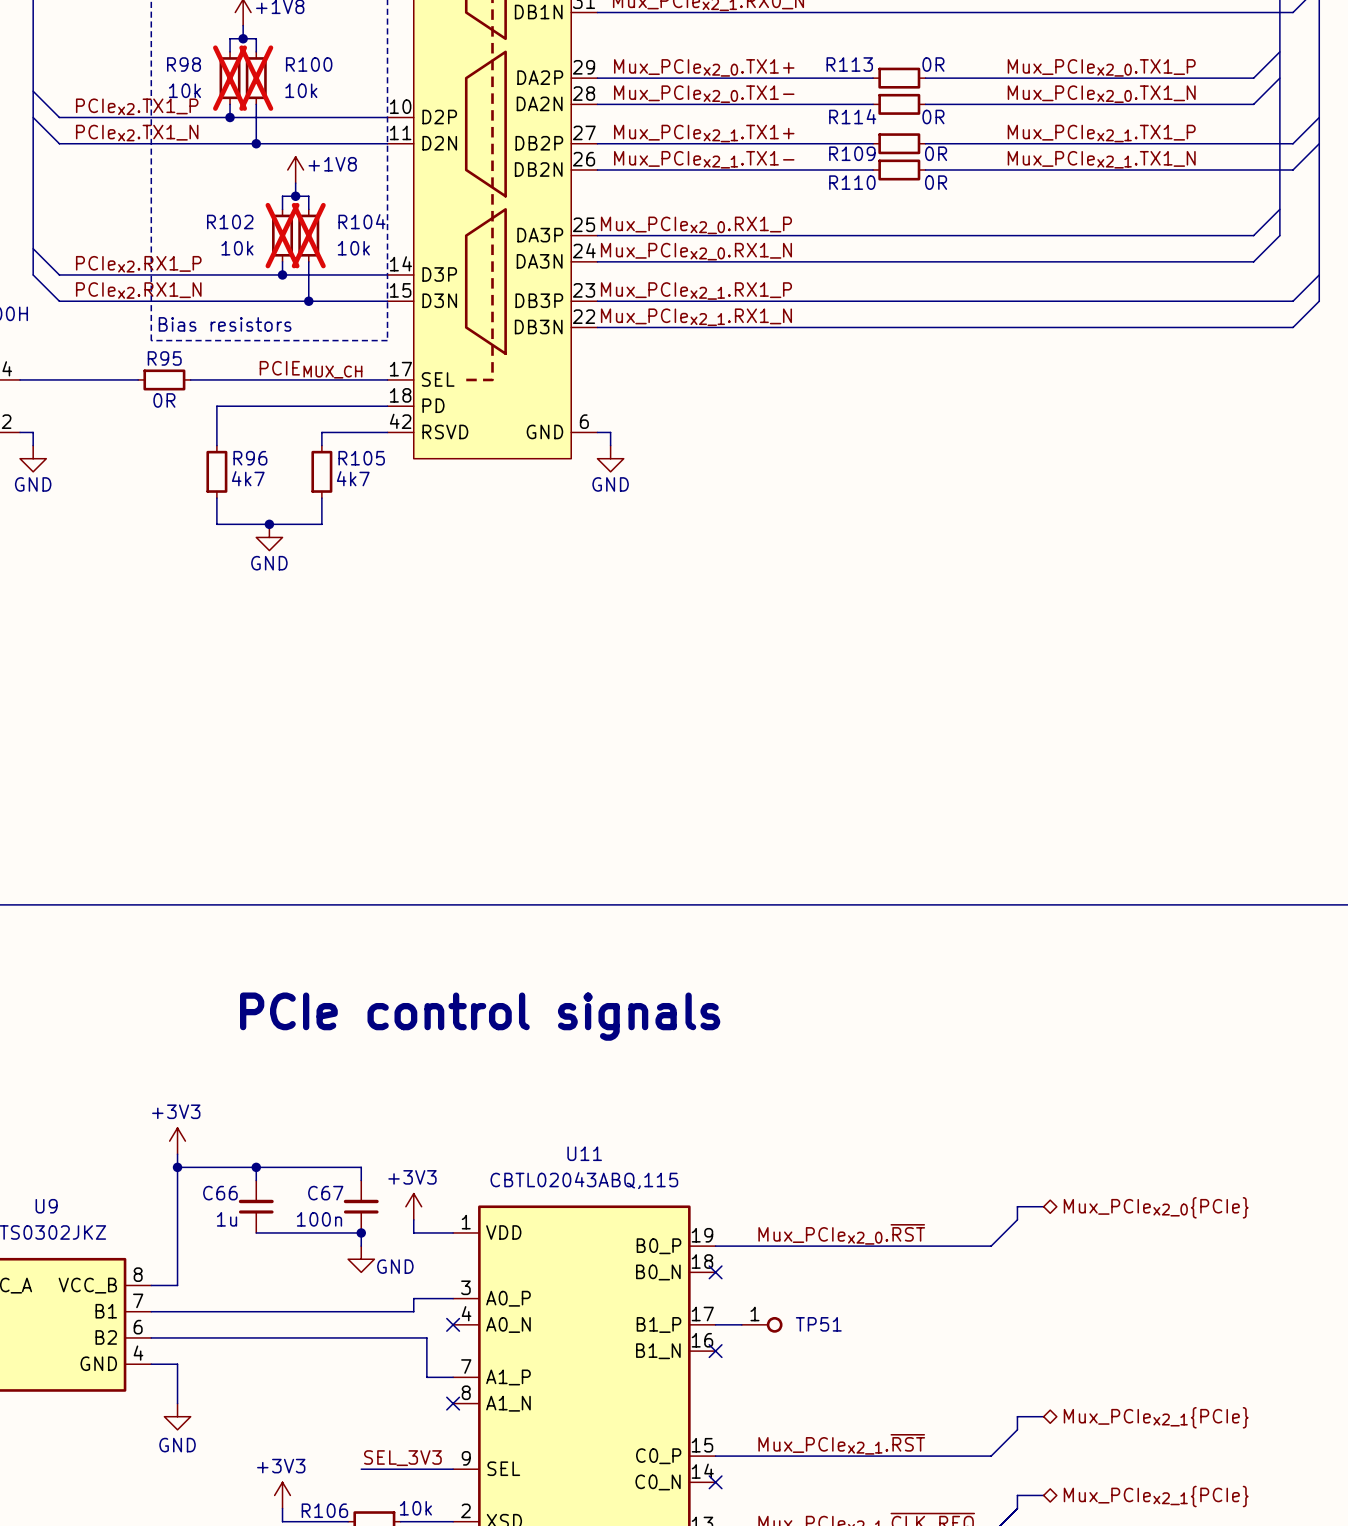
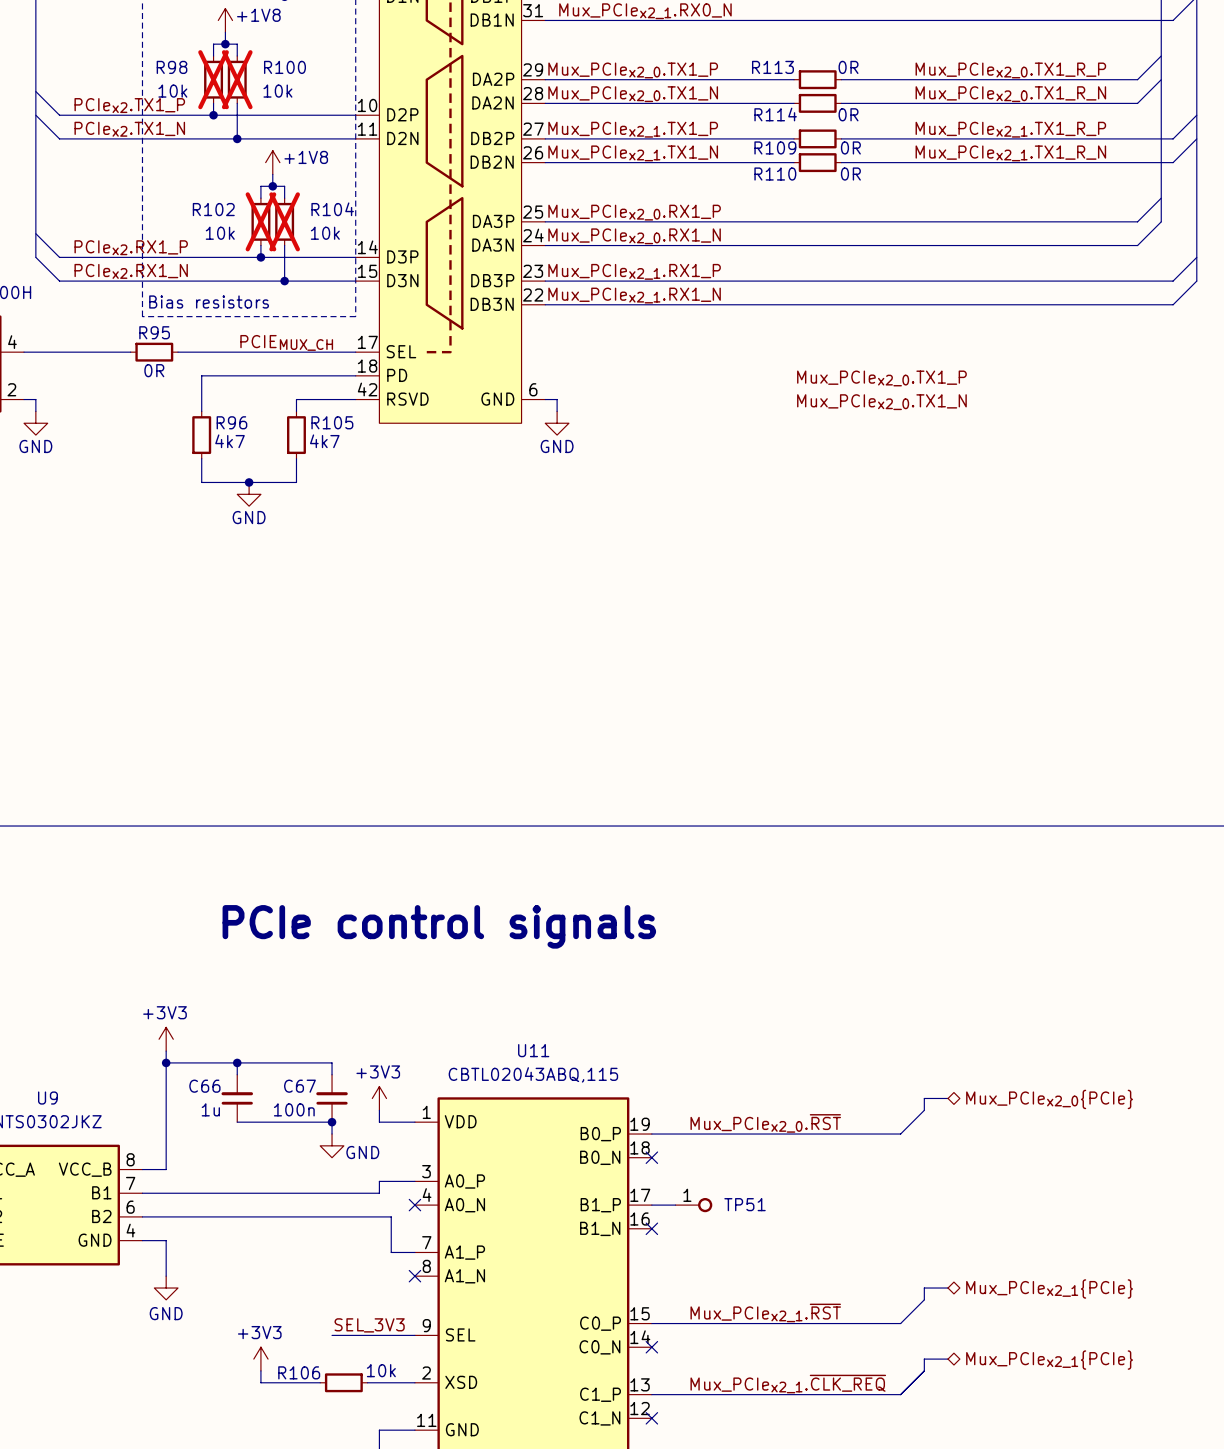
label: Mux_PCIex2_0.TX1+ (704, 67) -> Mux_PCIex2_0.TX1_P (633, 70)
label: Mux_PCIex2_0.TX1_P (1101, 67) -> Mux_PCIex2_0.TX1_R_P (1010, 70)
label: Mux_PCIex2_0.TX1- (704, 94) -> Mux_PCIex2_0.TX1_N (633, 94)
label: Mux_PCIex2_0.TX1_N (1101, 94) -> Mux_PCIex2_0.TX1_R_N (1010, 94)
label: Mux_PCIex2_1.TX1+ (704, 133) -> Mux_PCIex2_1.TX1_P (633, 129)
label: Mux_PCIex2_1.TX1_P (1101, 133) -> Mux_PCIex2_1.TX1_R_P (1010, 129)
label: Mux_PCIex2_1.TX1- (704, 159) -> Mux_PCIex2_1.TX1_N (633, 153)
label: Mux_PCIex2_1.TX1_N (1101, 159) -> Mux_PCIex2_1.TX1_R_N (1010, 153)
label: none -> Mux_PCIex2_0.TX1_P (881, 378)
label: none -> Mux_PCIex2_0.TX1_N (881, 402)

